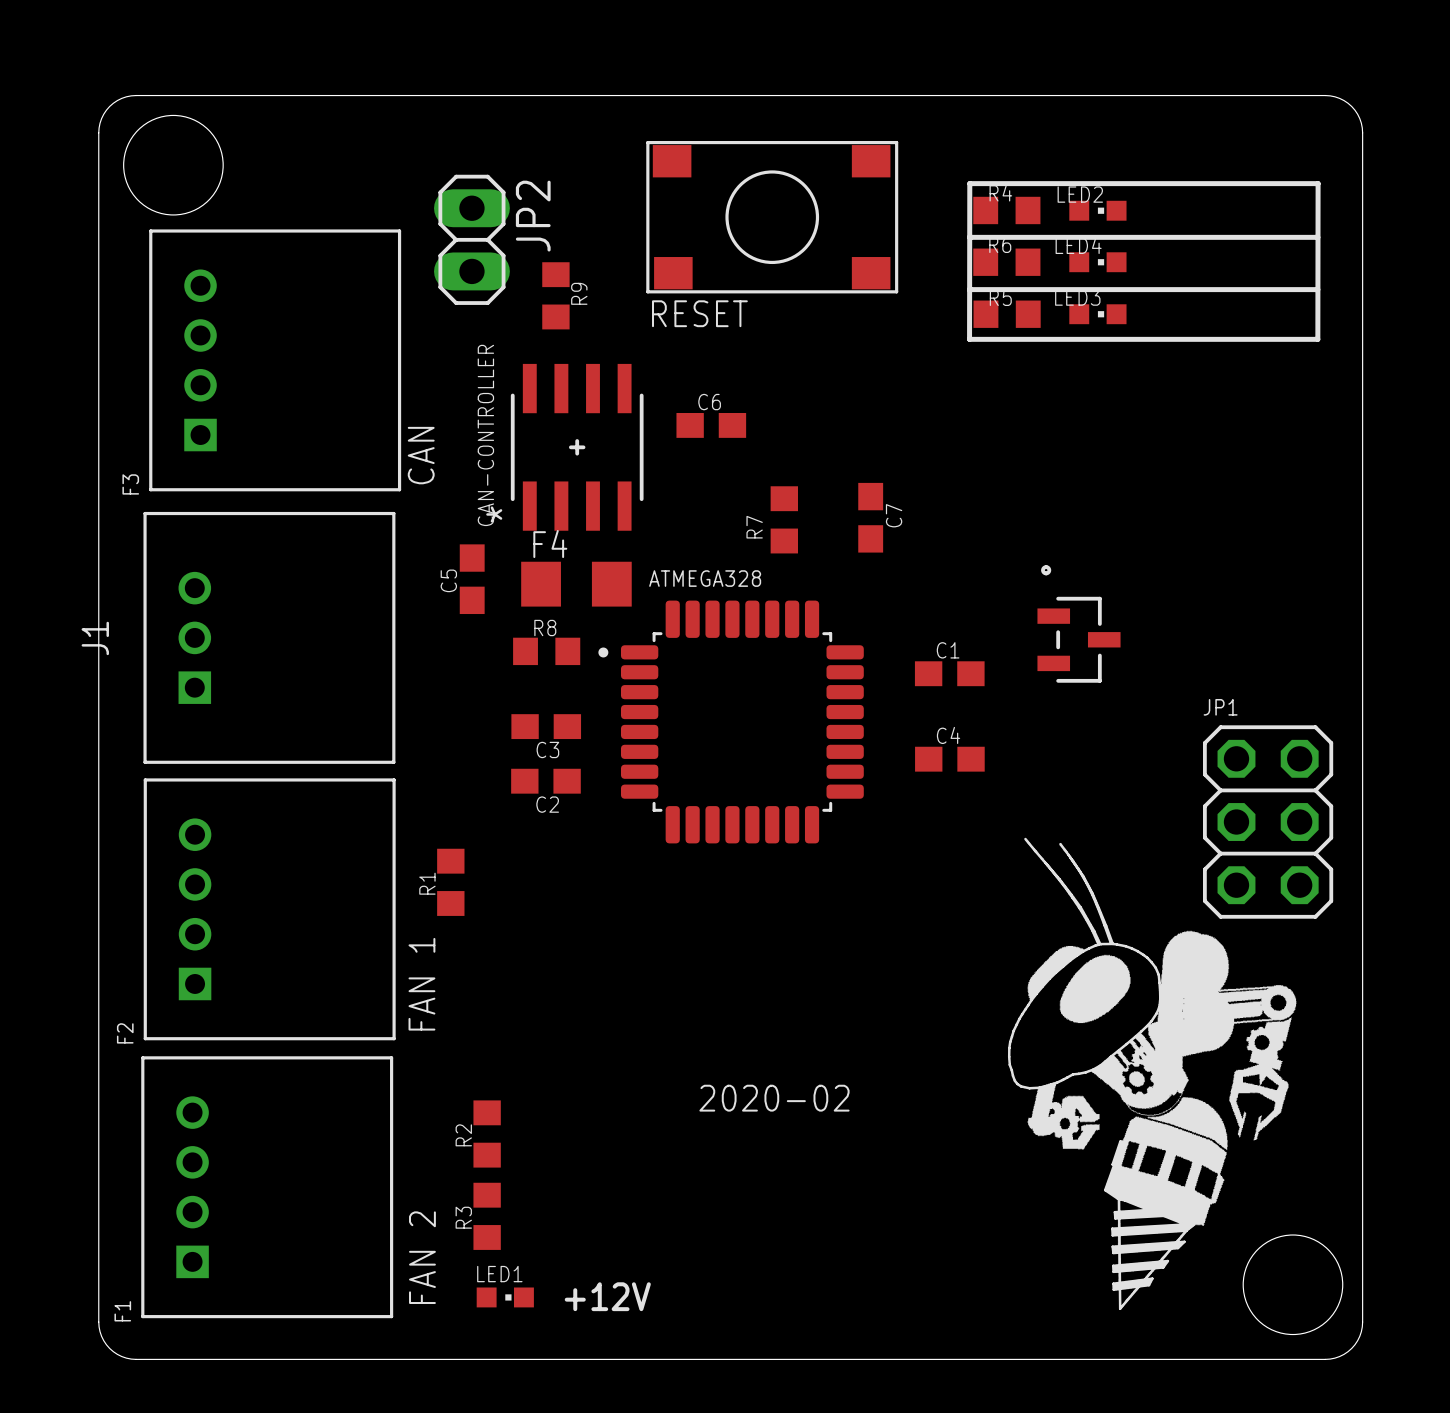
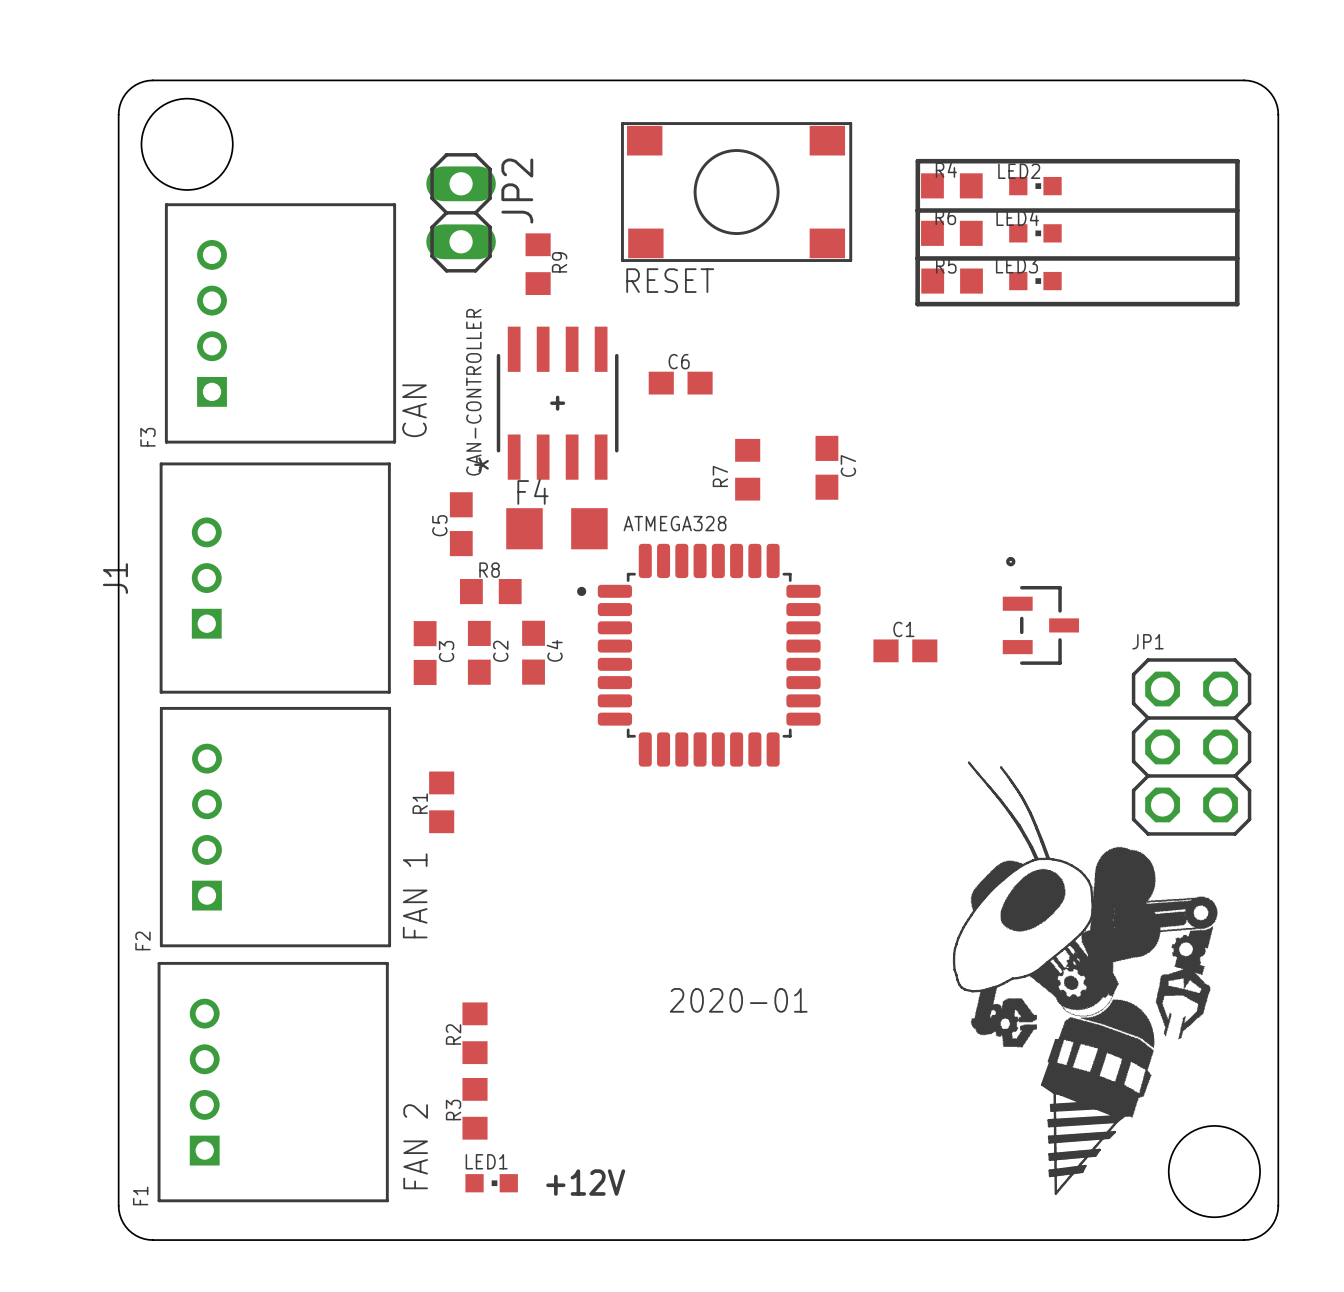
part position: (1079, 623) -> (1040, 610)
R8 position: (546, 651) -> (490, 591)
C1 position: (949, 673) -> (905, 650)
C3 rotation: 0° (546, 726) -> 90° clockwise (425, 653)
C3 position: (546, 726) -> (425, 653)
C4 rotation: 0° (949, 759) -> 90° clockwise (533, 652)
C4 position: (949, 759) -> (533, 652)
C2 rotation: 0° (545, 781) -> 90° clockwise (479, 652)
C2 position: (545, 781) -> (479, 652)
text: 2020-02 (774, 1098) -> 2020-01 (738, 1000)

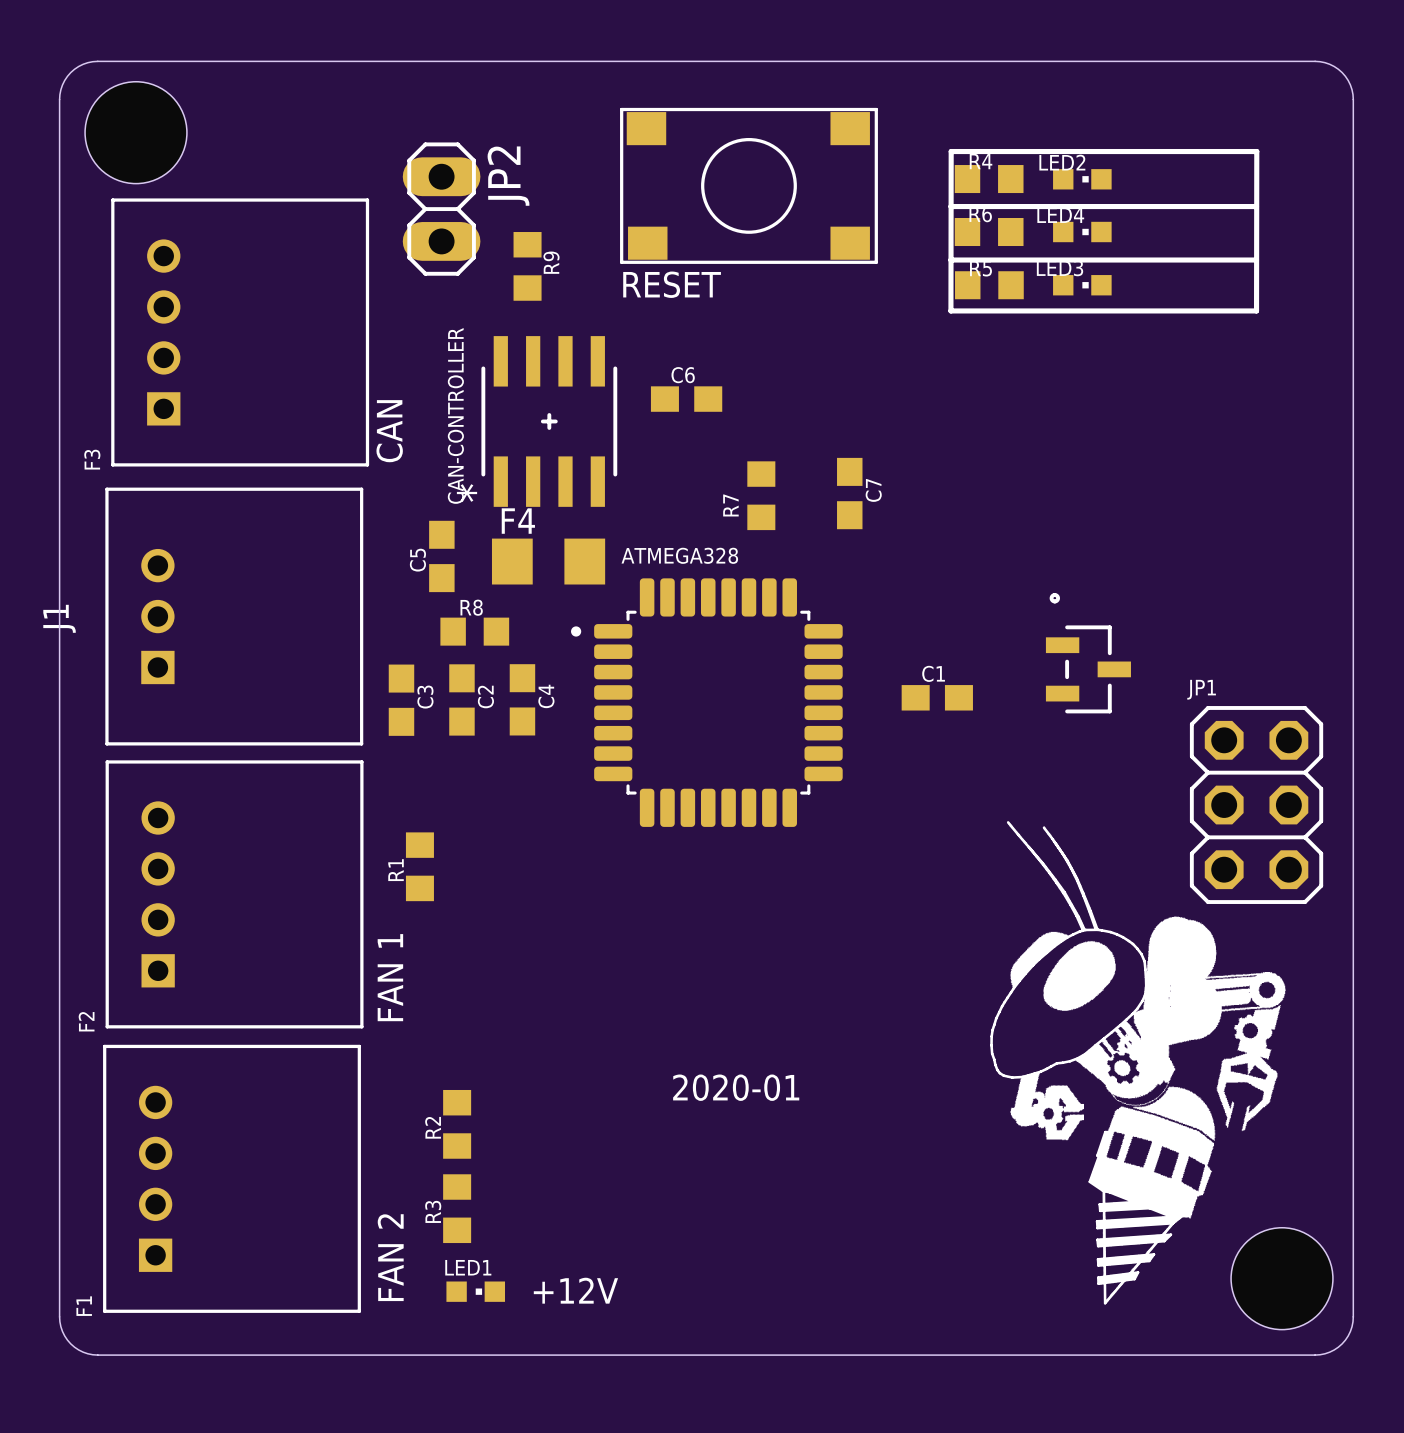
line: (1191, 161) (1237, 161) (1237, 304) (1191, 304) -> (1256, 151) (1256, 310)
line: (1191, 210) (1237, 210) -> none
line: (1191, 258) (1237, 258) -> none

